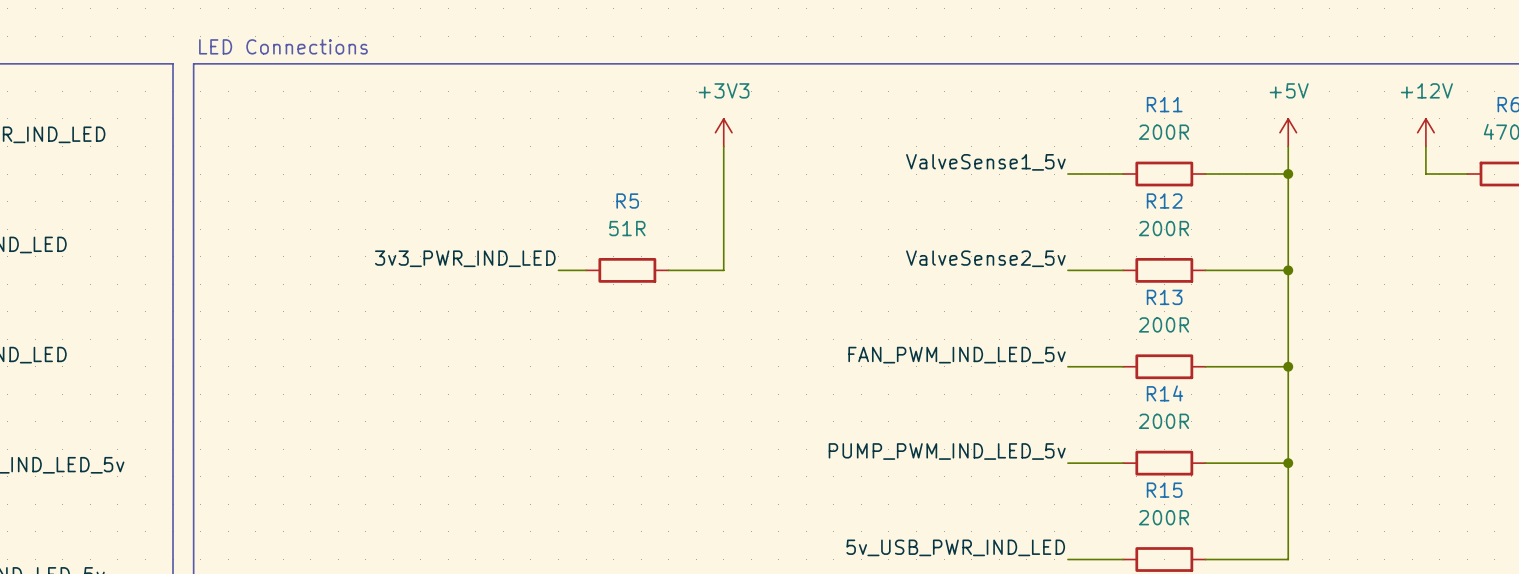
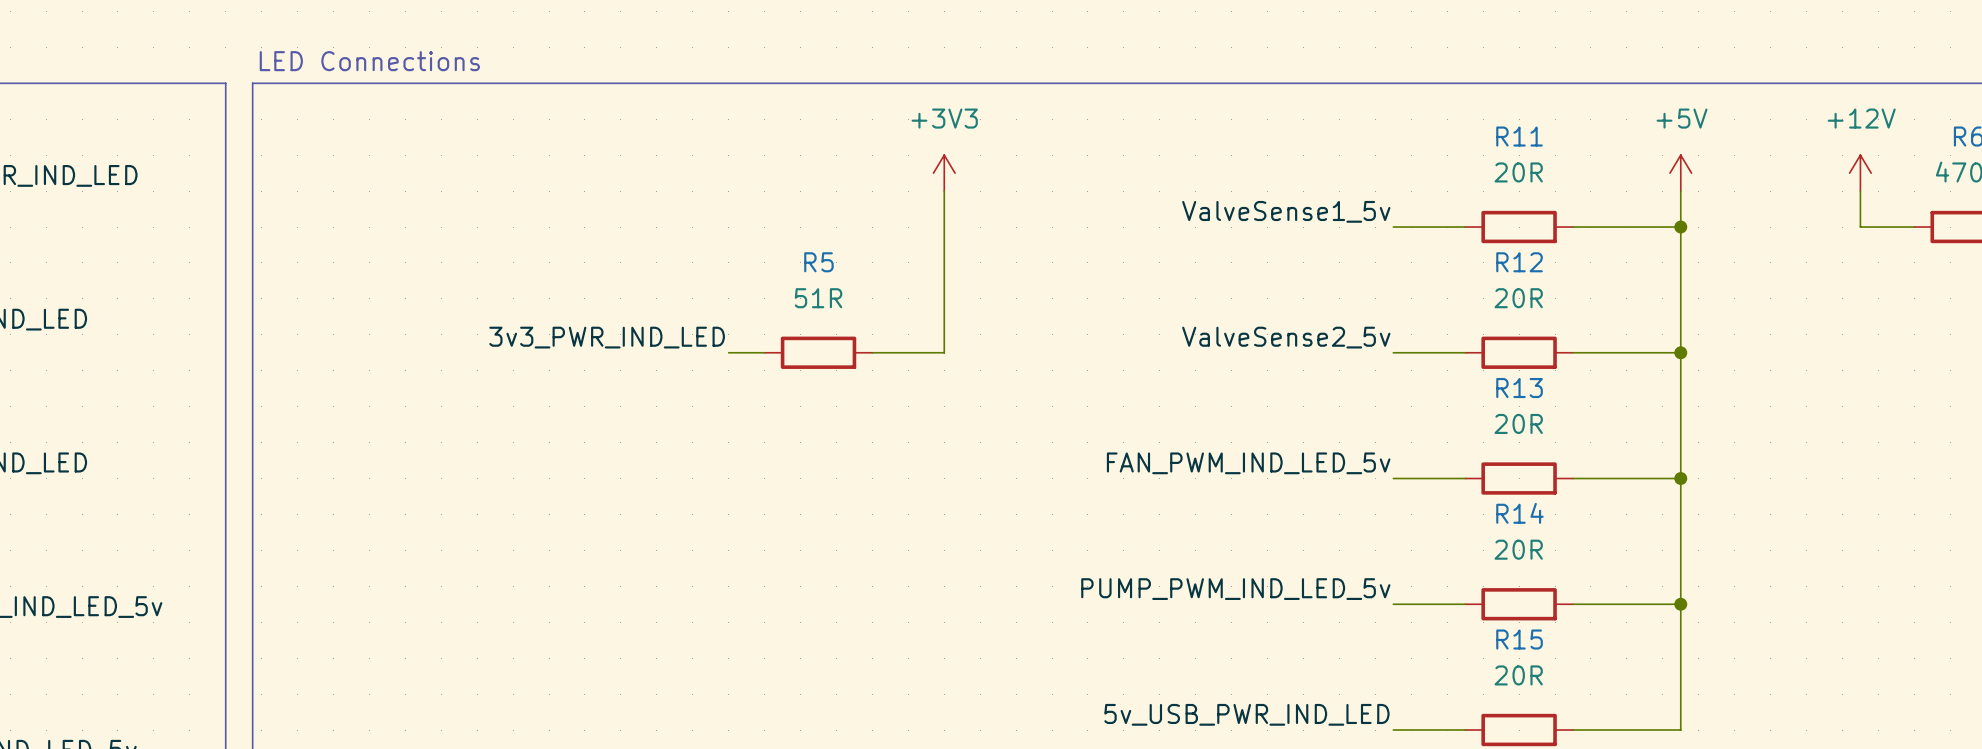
R11 value: 200R (1163, 132) -> 20R (1518, 172)
R12 value: 200R (1163, 228) -> 20R (1518, 298)
R13 value: 200R (1163, 324) -> 20R (1518, 423)
R14 value: 200R (1163, 421) -> 20R (1518, 549)
R15 value: 200R (1163, 517) -> 20R (1518, 675)

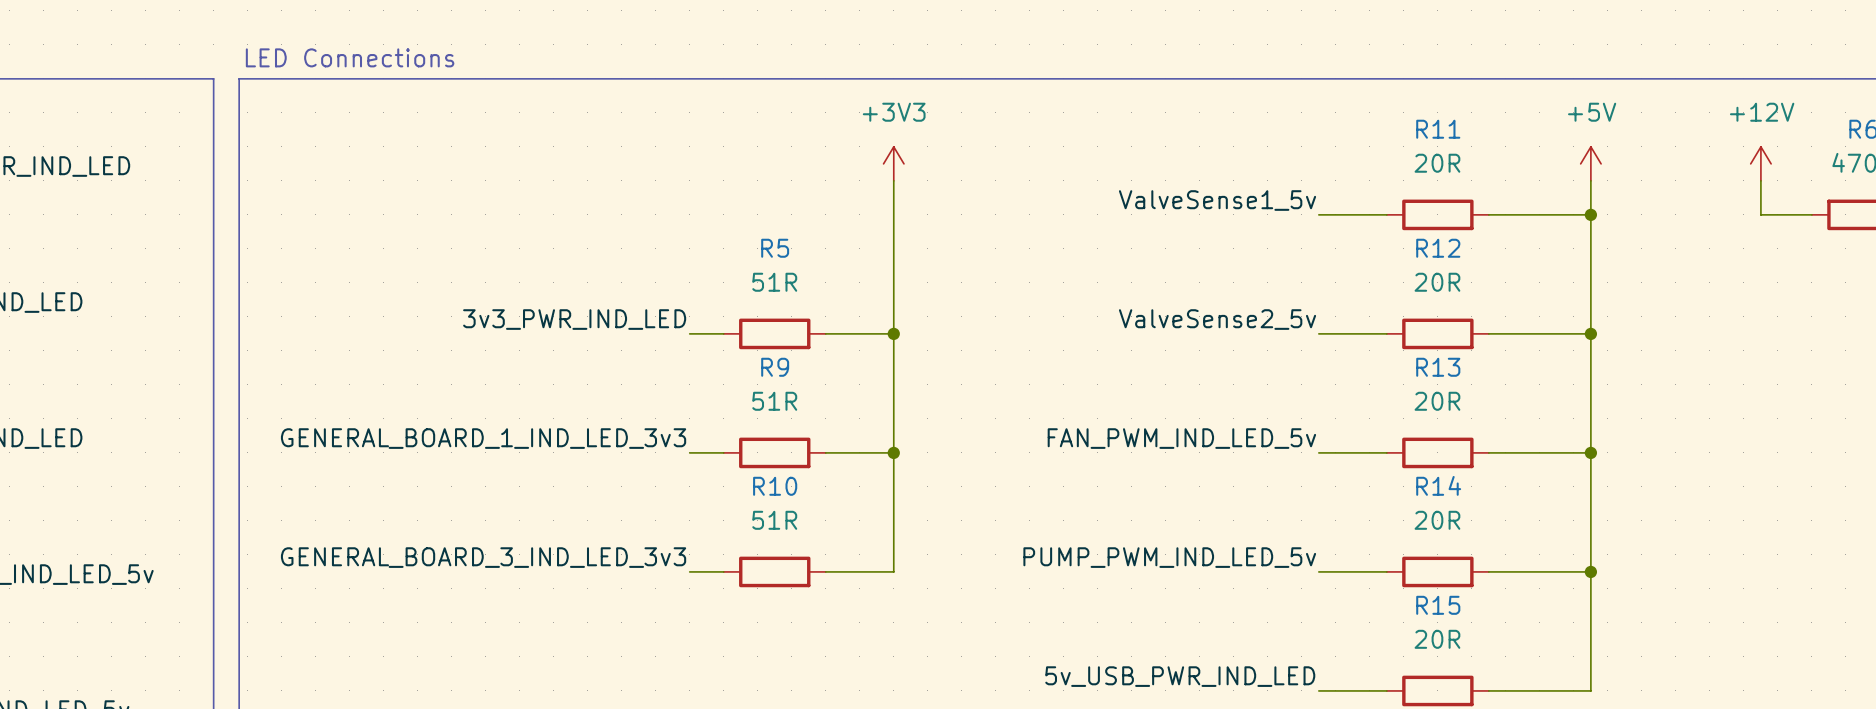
wire: none -> (893, 333) (893, 571) (825, 571)
junction: none -> (893, 333)
label: none -> GENERAL_BOARD_1_IND_LED_3v3 (483, 438)
wire: none -> (689, 452) (723, 452)
R9: none -> 51R (774, 452)
wire: none -> (825, 452) (893, 452)
junction: none -> (893, 452)
label: none -> GENERAL_BOARD_3_IND_LED_3v3 (483, 557)
wire: none -> (689, 571) (723, 571)
R10: none -> 51R (774, 571)

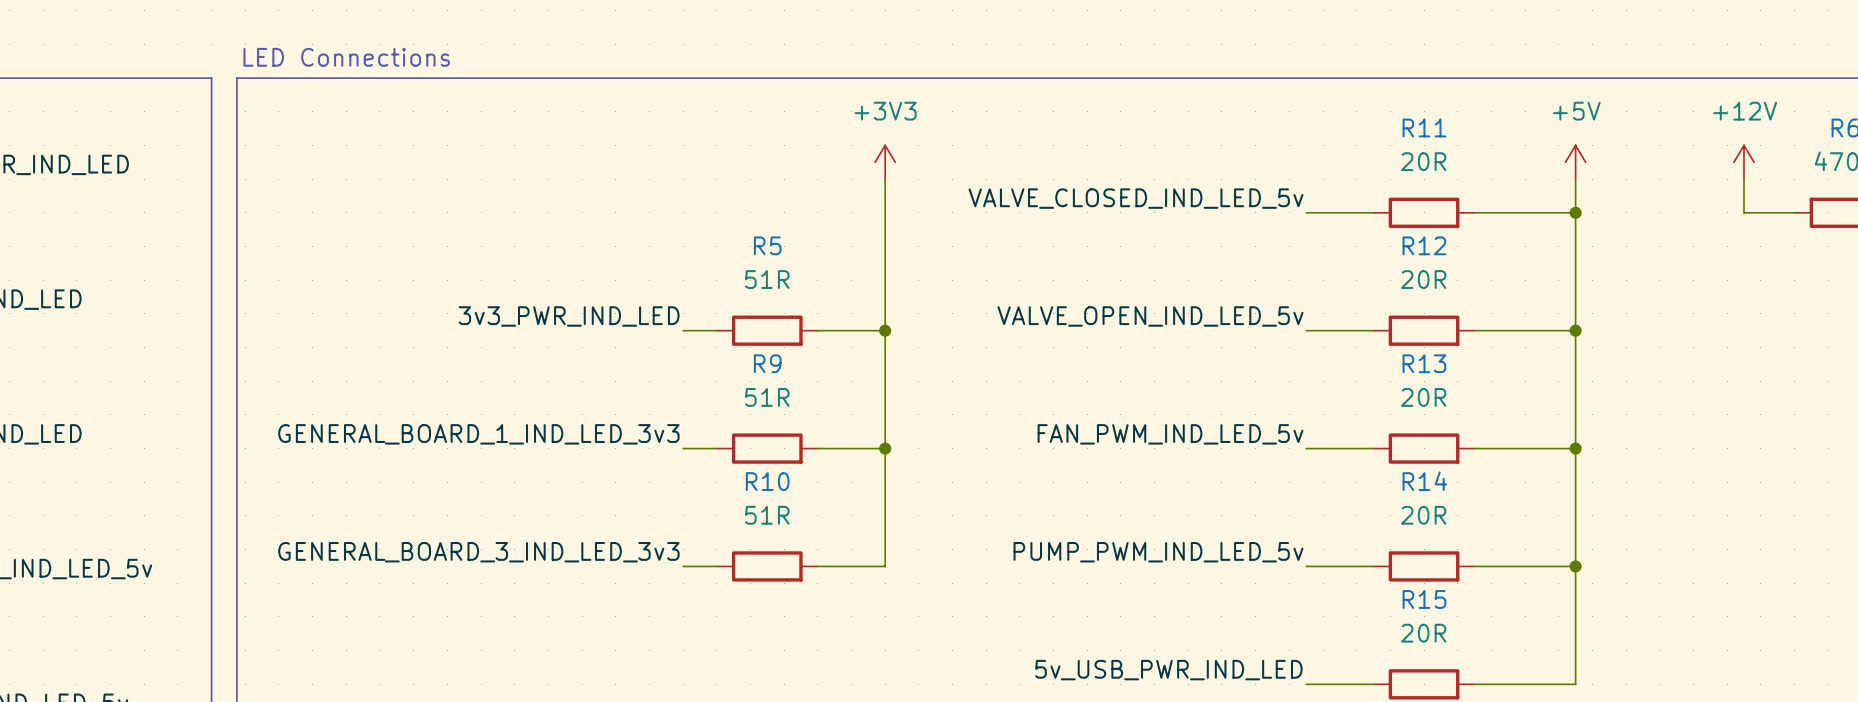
label: ValveSense1_5v (1217, 200) -> VALVE_CLOSED_IND_LED_5v (1136, 198)
label: ValveSense2_5v (1217, 319) -> VALVE_OPEN_IND_LED_5v (1150, 316)

